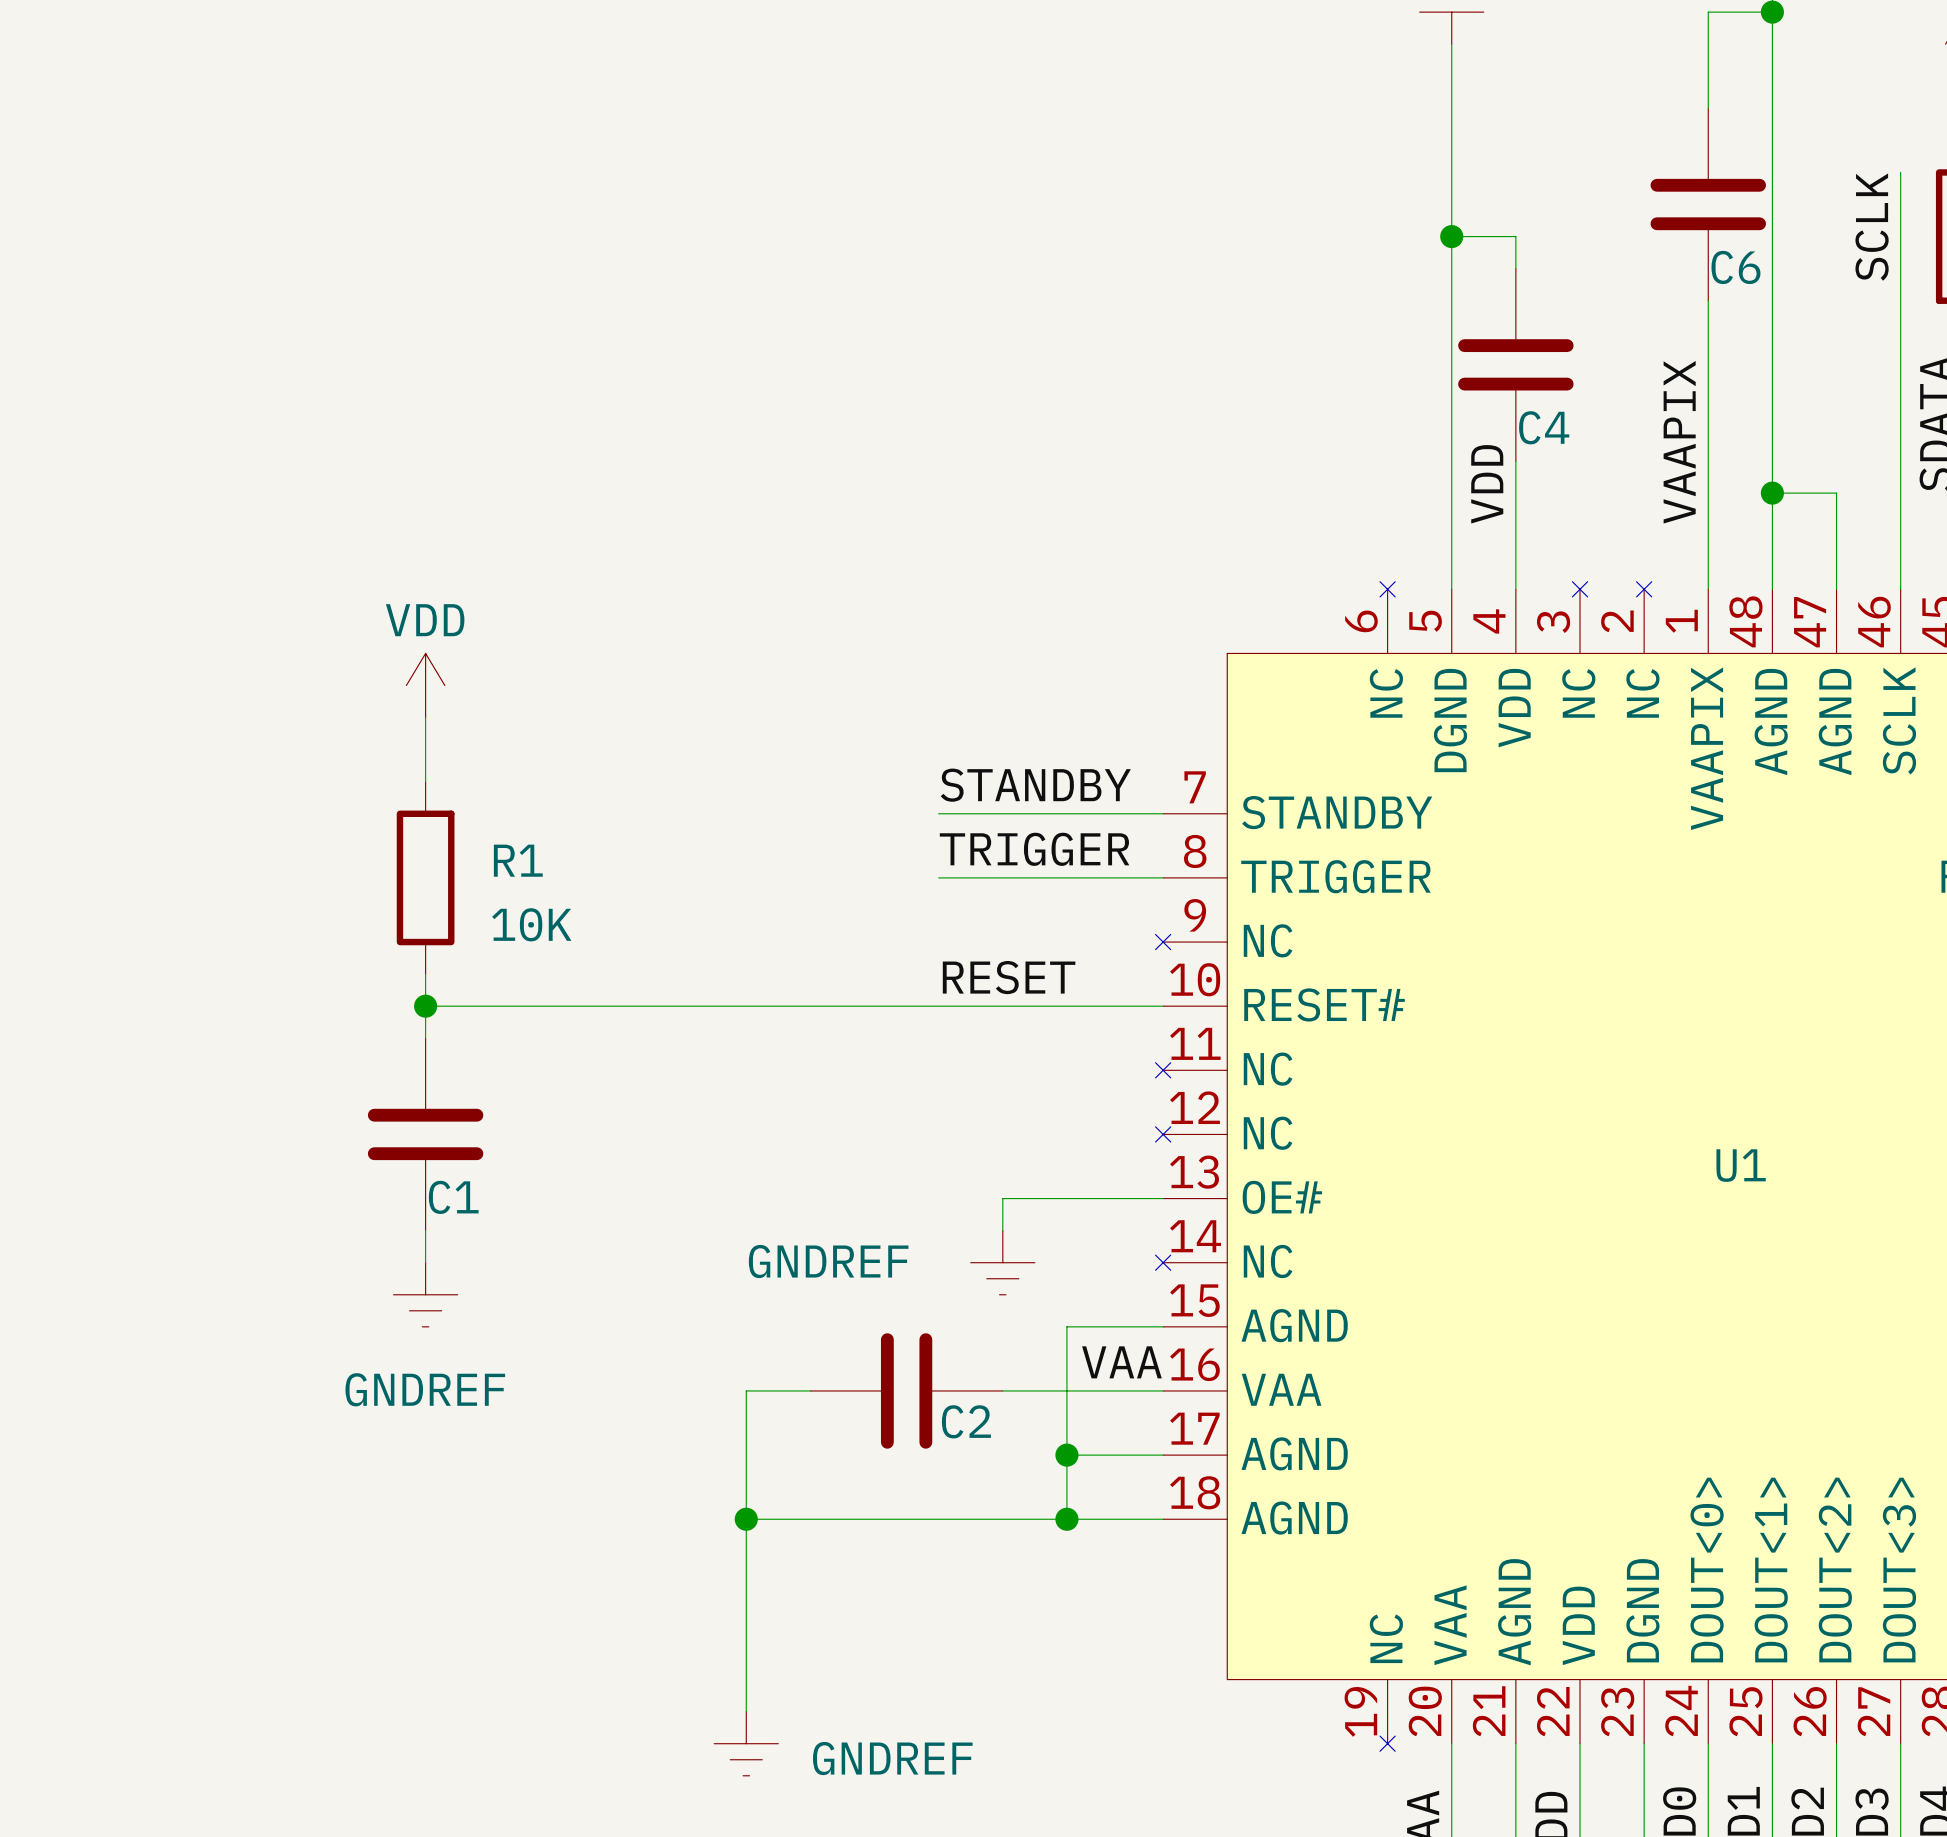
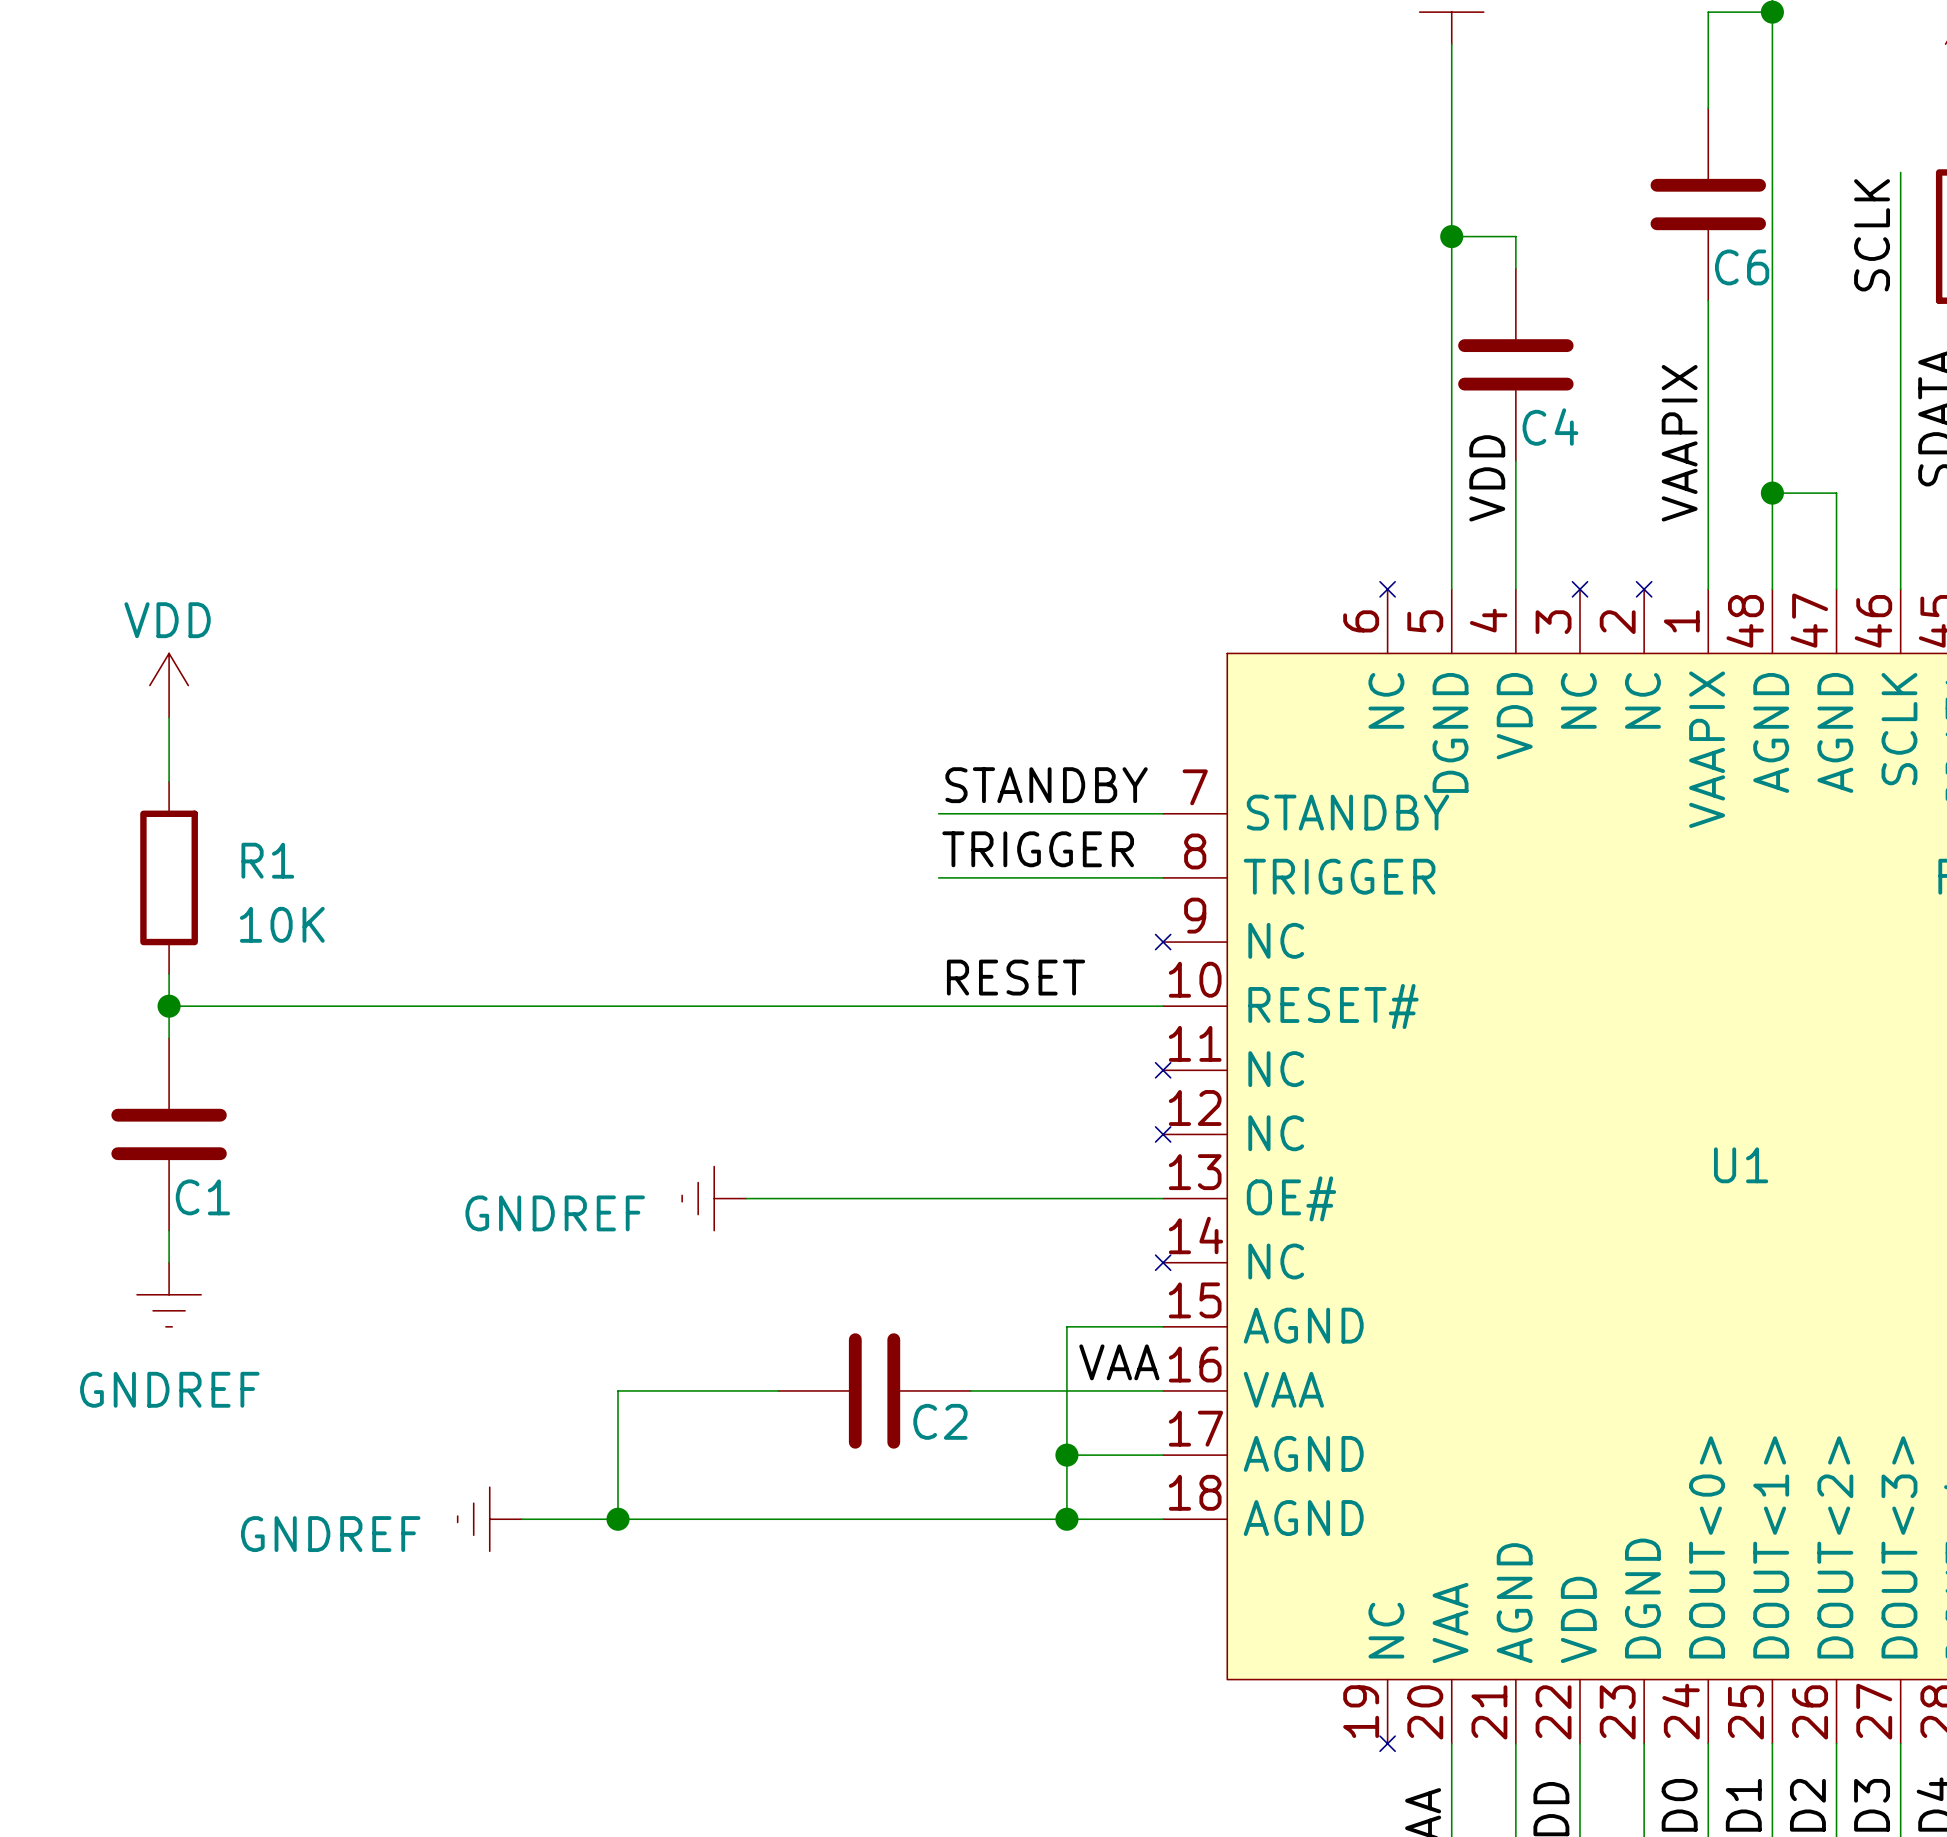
power symbol position: VDD (425, 685) -> VDD (169, 685)
wire: (425, 717) (425, 781) -> (169, 717) (169, 781)
R1 position: (425, 877) -> (169, 877)
wire: (425, 974) (425, 1038) -> (169, 974) (169, 1038)
wire: none -> (169, 1006) (425, 1006)
junction: none -> (169, 1006)
junction: (425, 1006) -> none
C1 position: (425, 1134) -> (169, 1134)
power symbol: none -> GNDREF (714, 1198)
wire: (1002, 1198) (1002, 1230) -> (1002, 1198) (746, 1198)
wire: (425, 1230) (425, 1262) -> (169, 1230) (169, 1262)
power symbol: GNDREF (1002, 1262) -> none
power symbol: none -> GNDREF (169, 1294)
power symbol: GNDREF (425, 1294) -> none
wire: (746, 1390) (746, 1711) -> (746, 1390) (618, 1390) (618, 1519)
C2 position: (906, 1390) -> (874, 1390)
power symbol: none -> GNDREF (489, 1519)
wire: none -> (521, 1519) (746, 1519)
junction position: (746, 1519) -> (618, 1519)
power symbol: GNDREF (746, 1743) -> none

